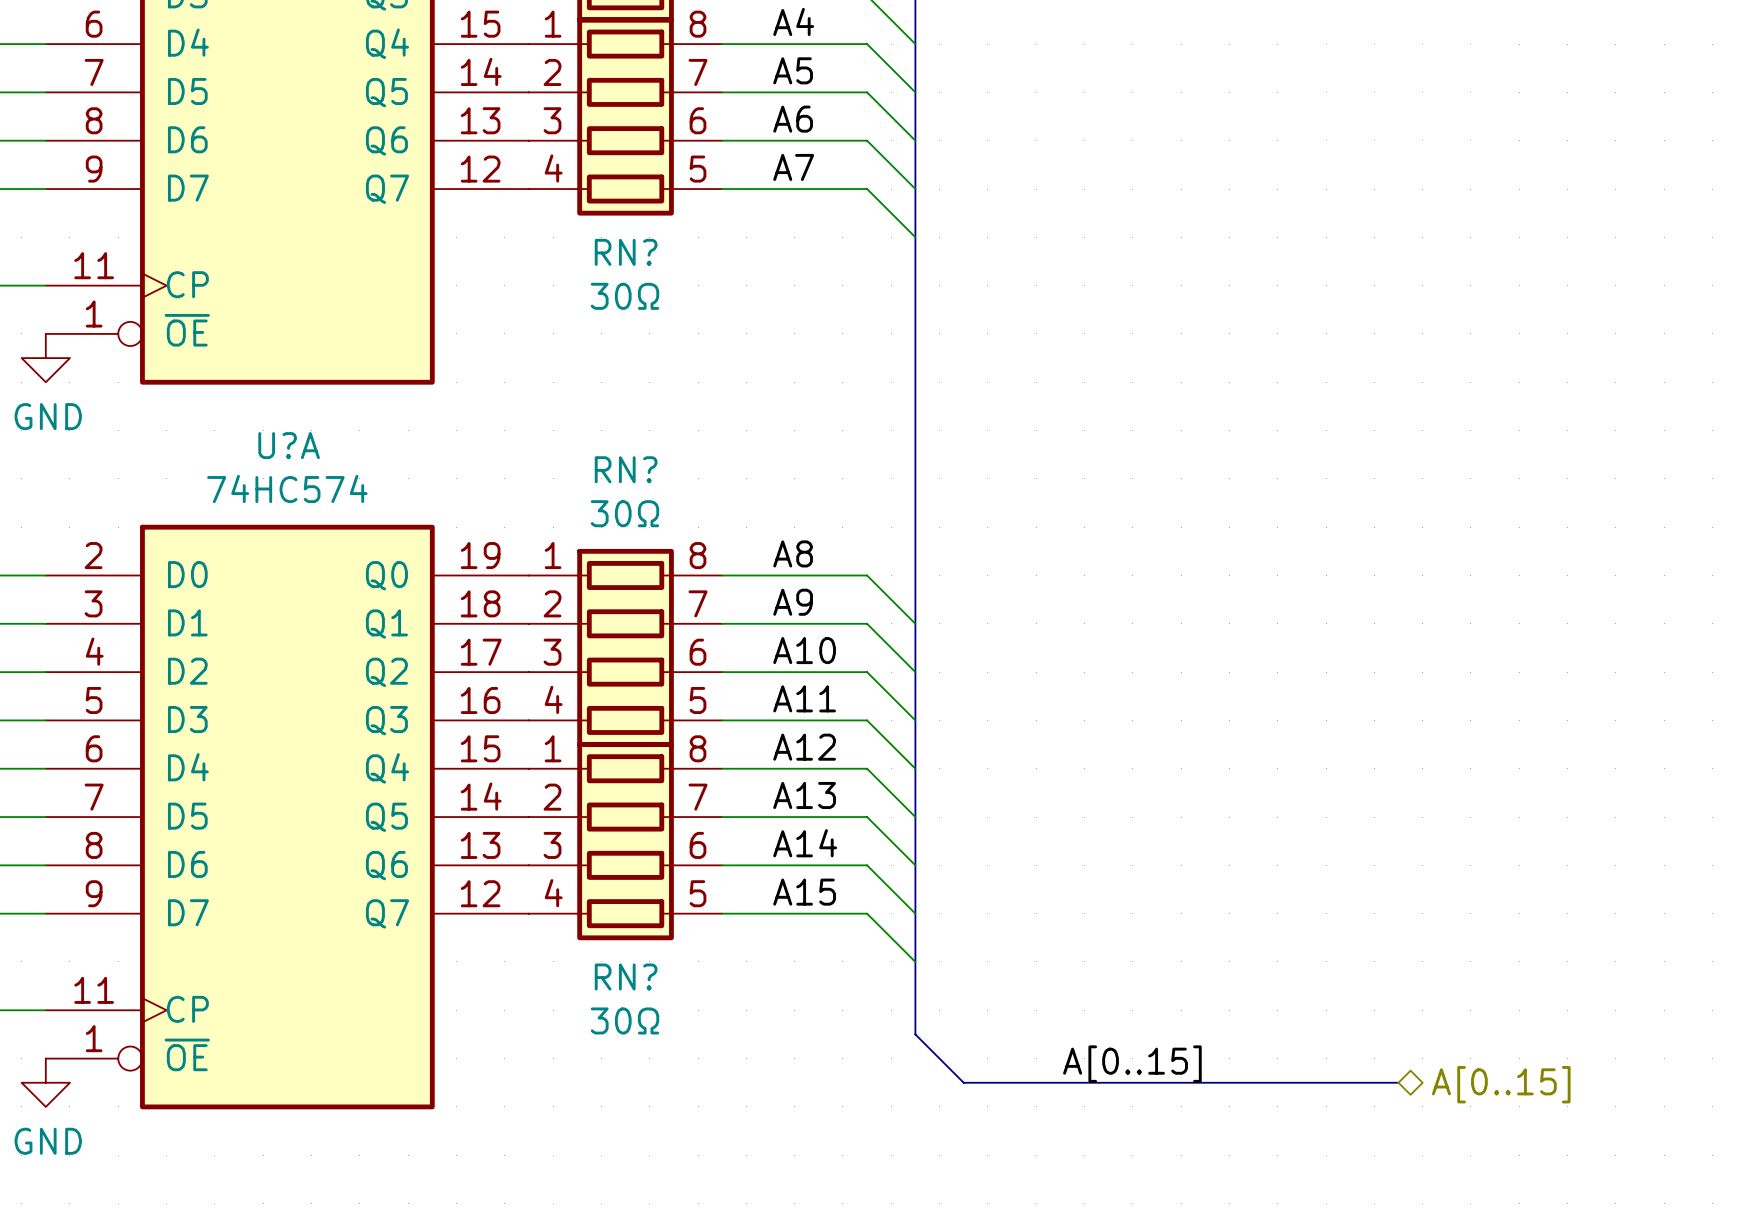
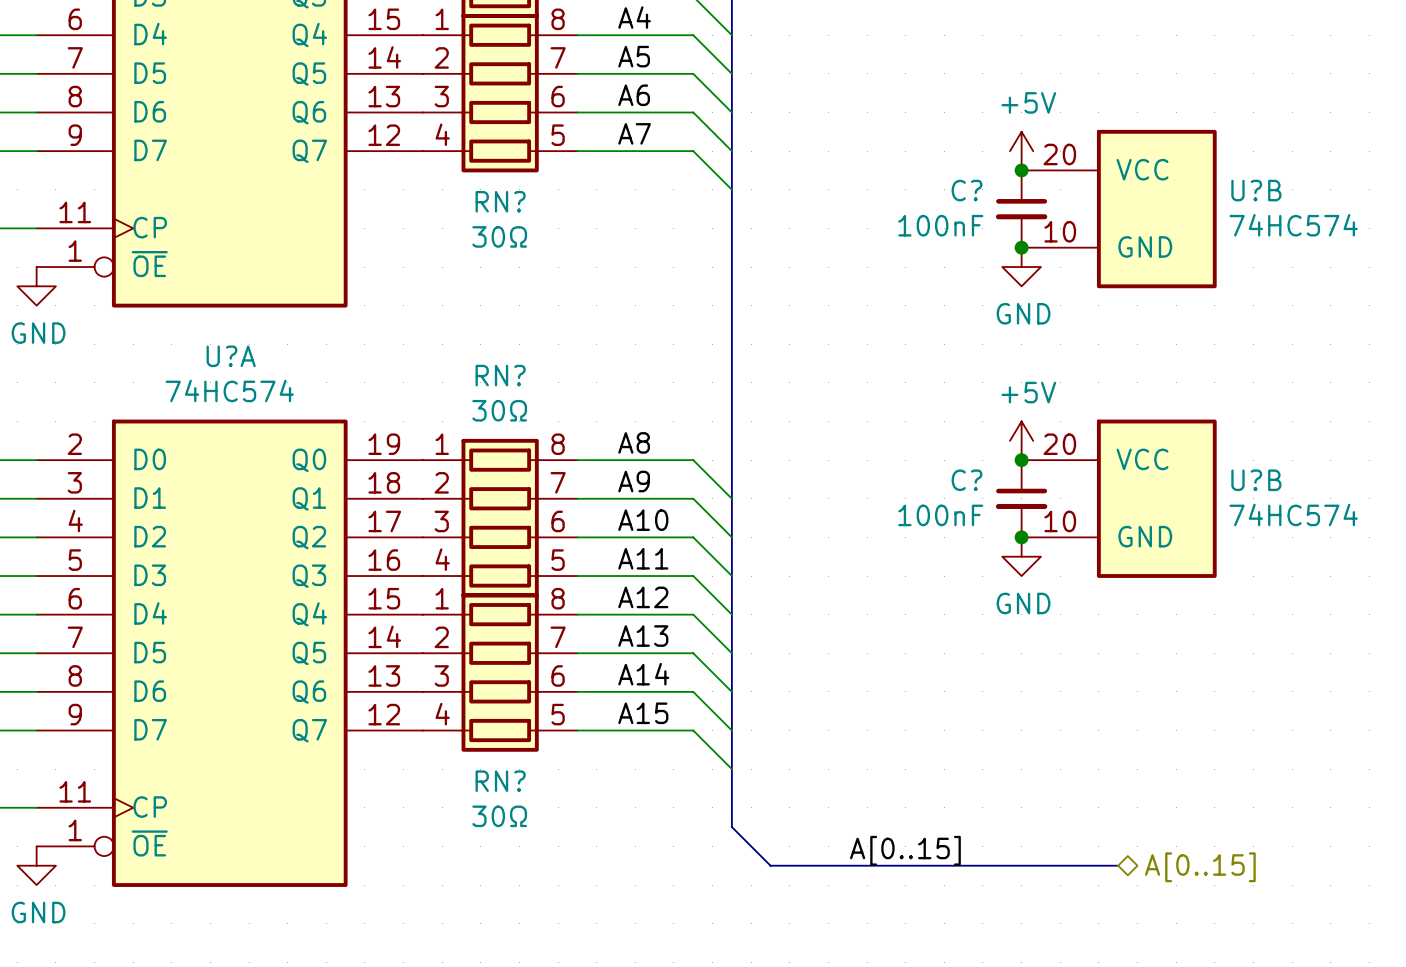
power symbol: none -> +5V (1021, 151)
junction: none -> (1021, 170)
C?: none -> 100nF (1021, 209)
U?B: none -> 74HC574 (1119, 209)
junction: none -> (1021, 247)
power symbol: none -> GND (1021, 267)
power symbol: none -> +5V (1021, 440)
junction: none -> (1021, 460)
C?: none -> 100nF (1021, 498)
U?B: none -> 74HC574 (1119, 498)
junction: none -> (1021, 537)
power symbol: none -> GND (1021, 556)

